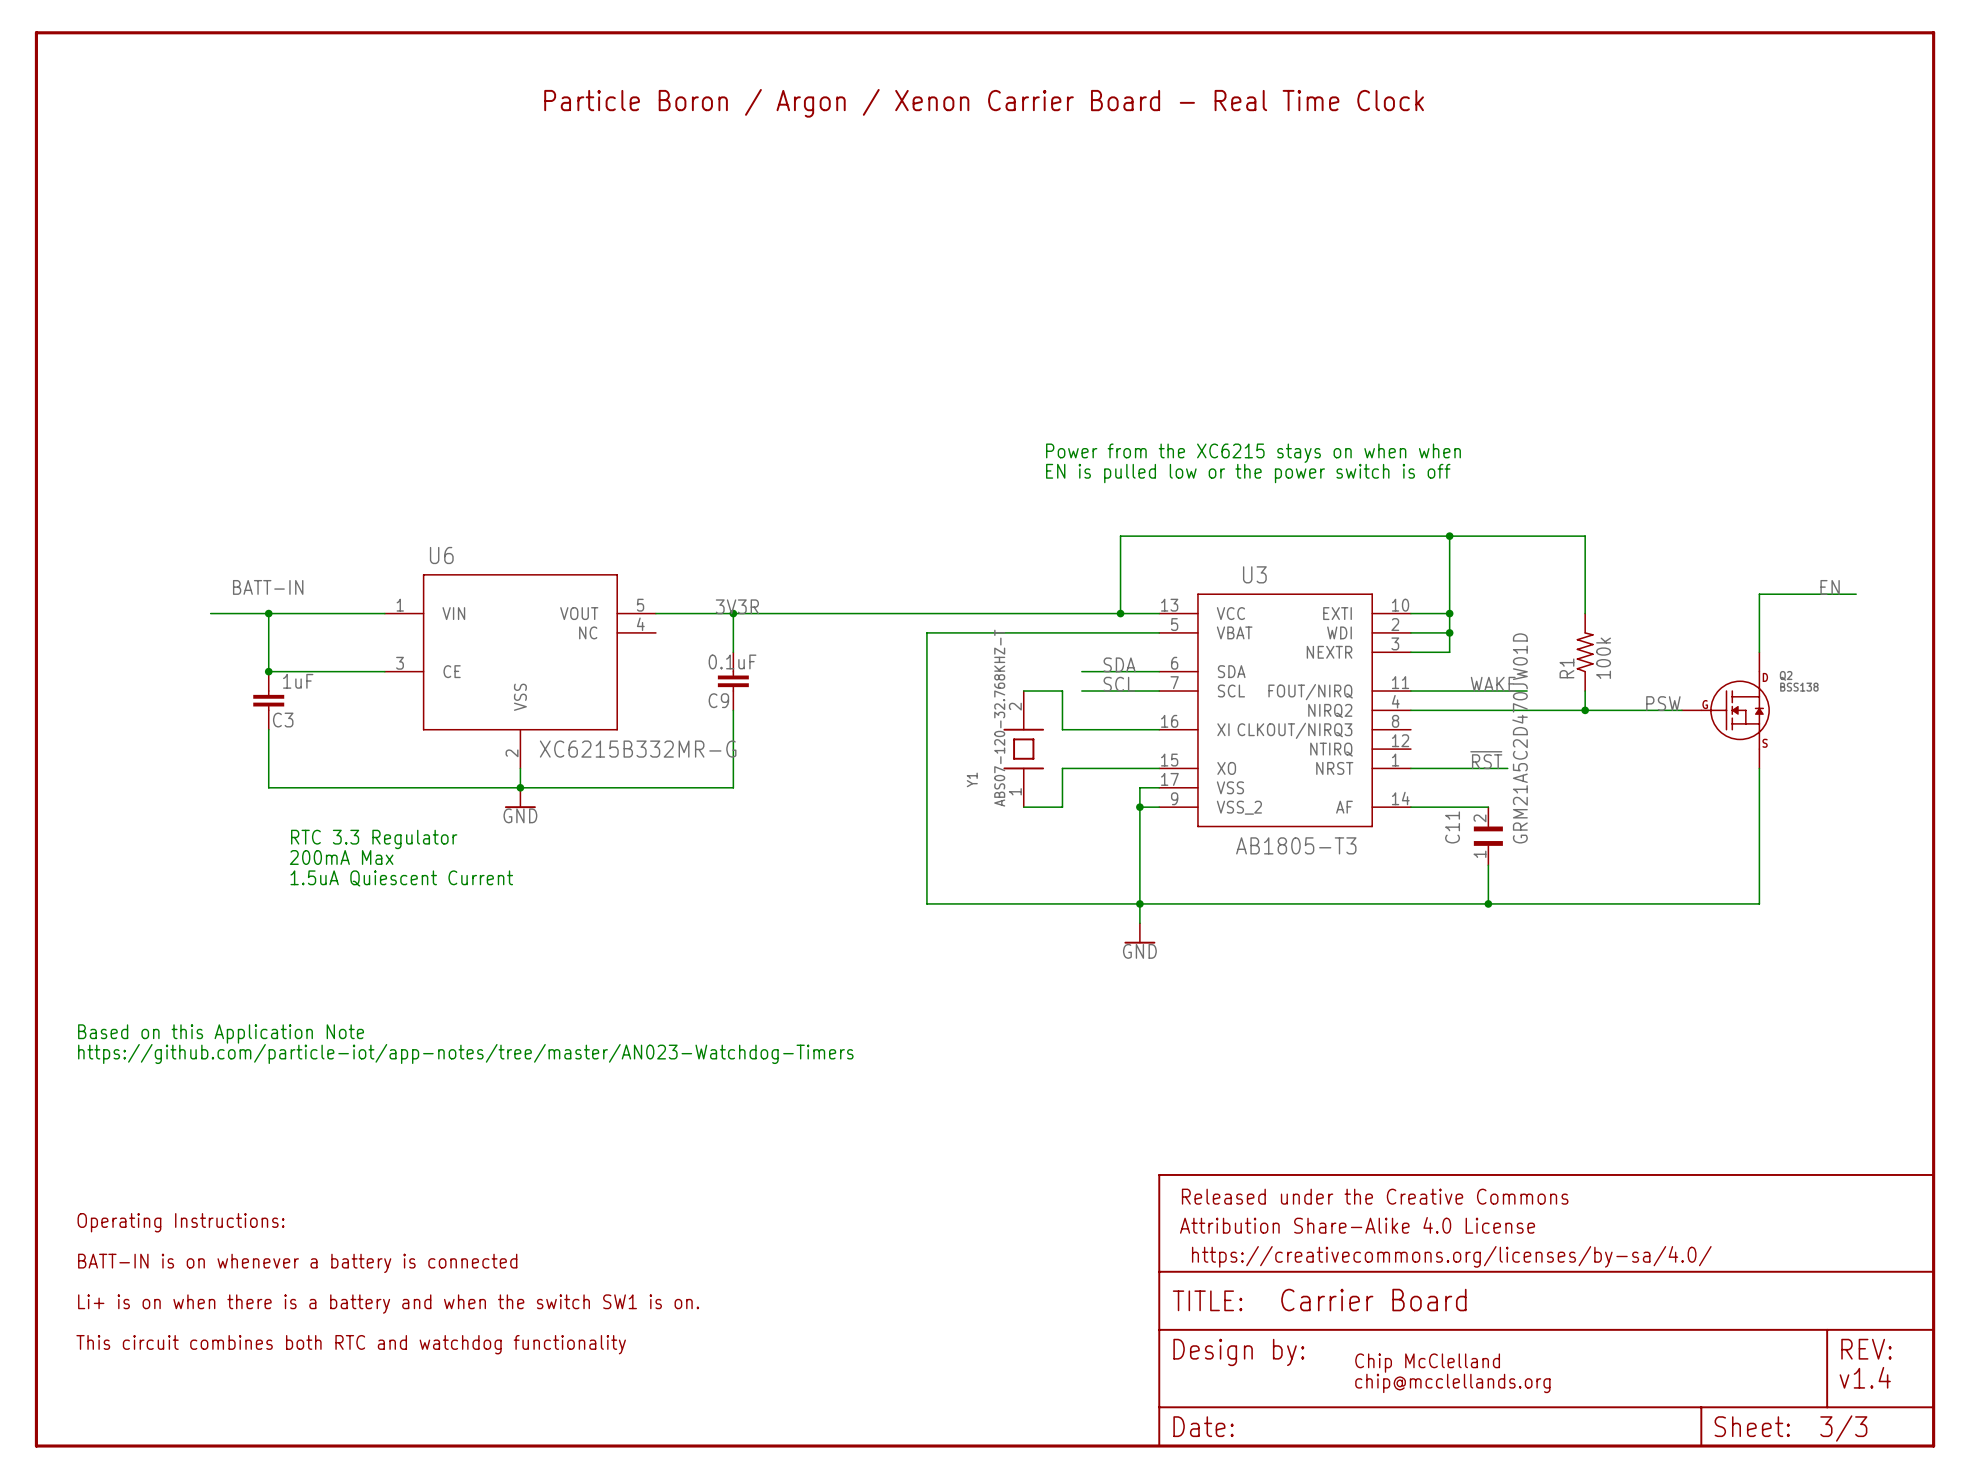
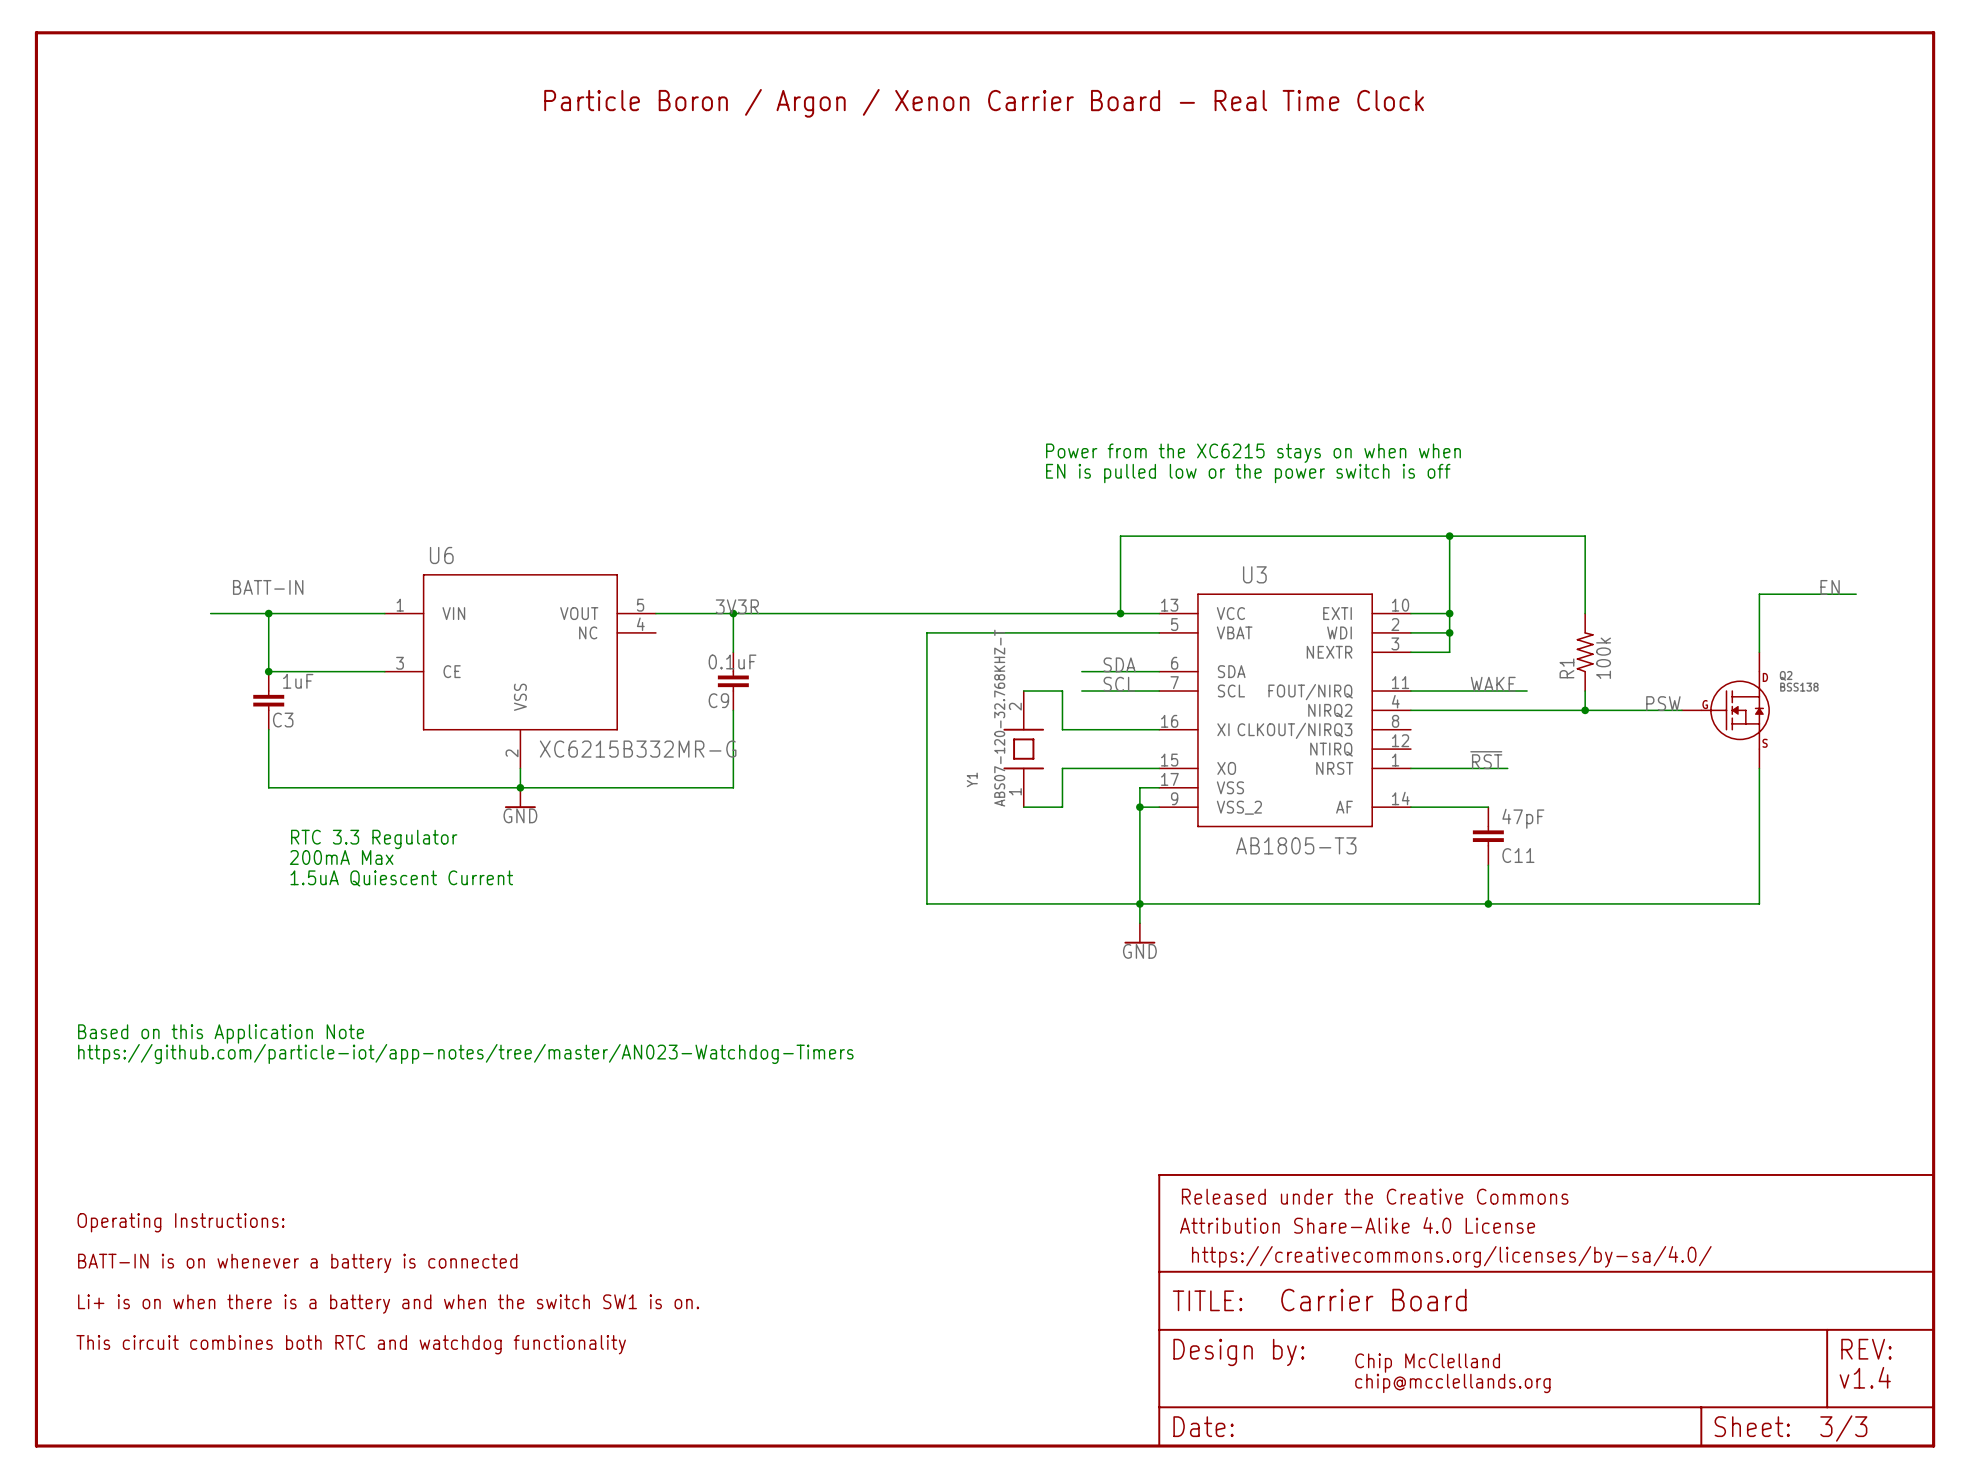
C11 value: GRM21A5C2D470JW01D (1520, 738) -> 47pF (1523, 818)
C11 symbol: [1473, 807, 1503, 866] -> [1472, 807, 1504, 866]
C11 name position: C11 (1452, 827) -> C11 (1518, 855)

